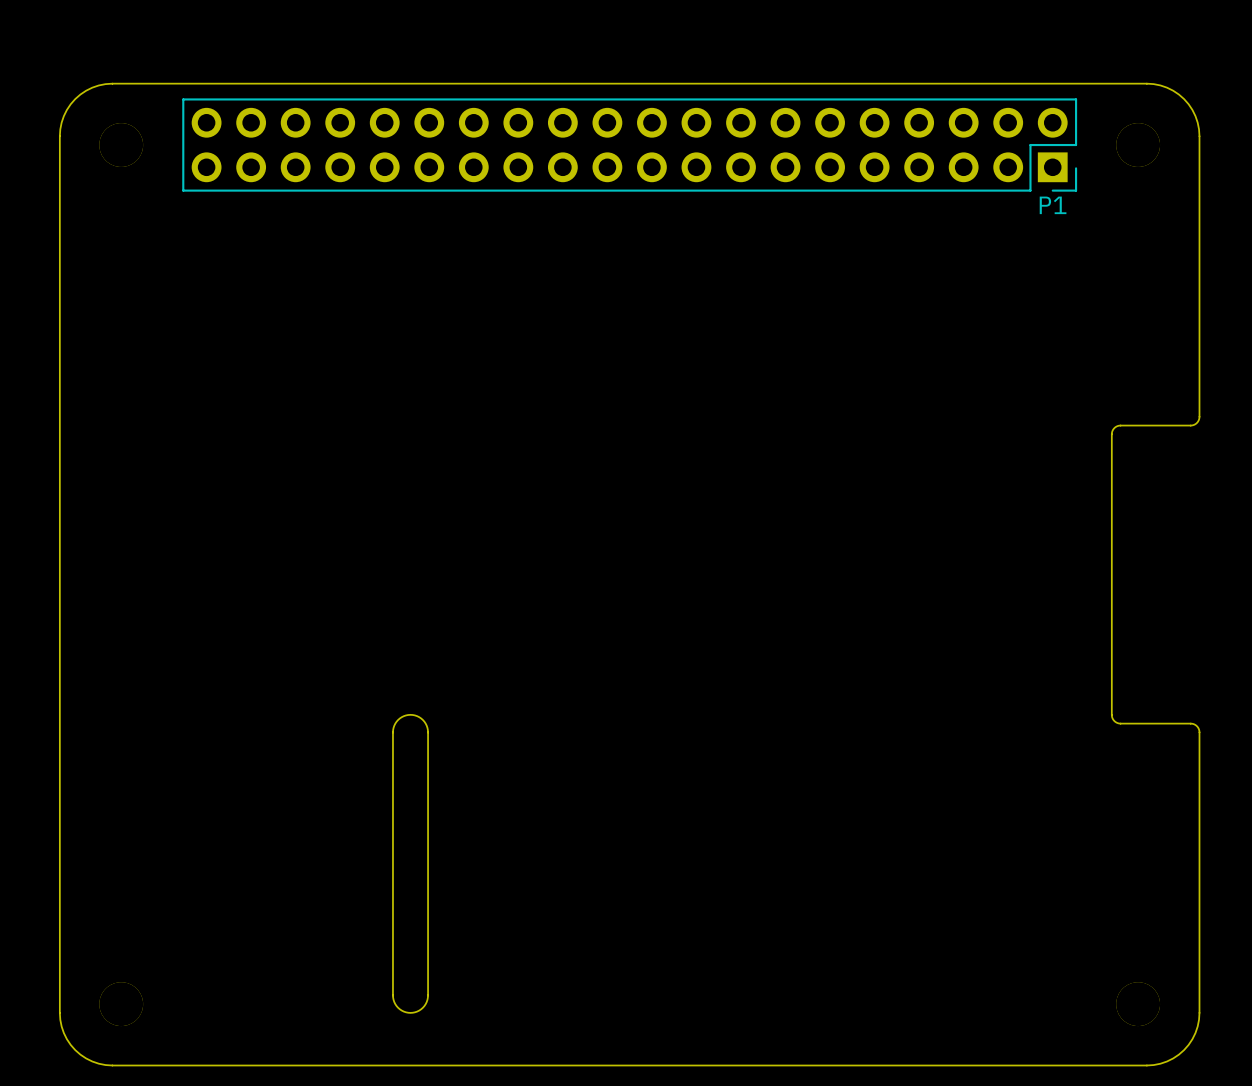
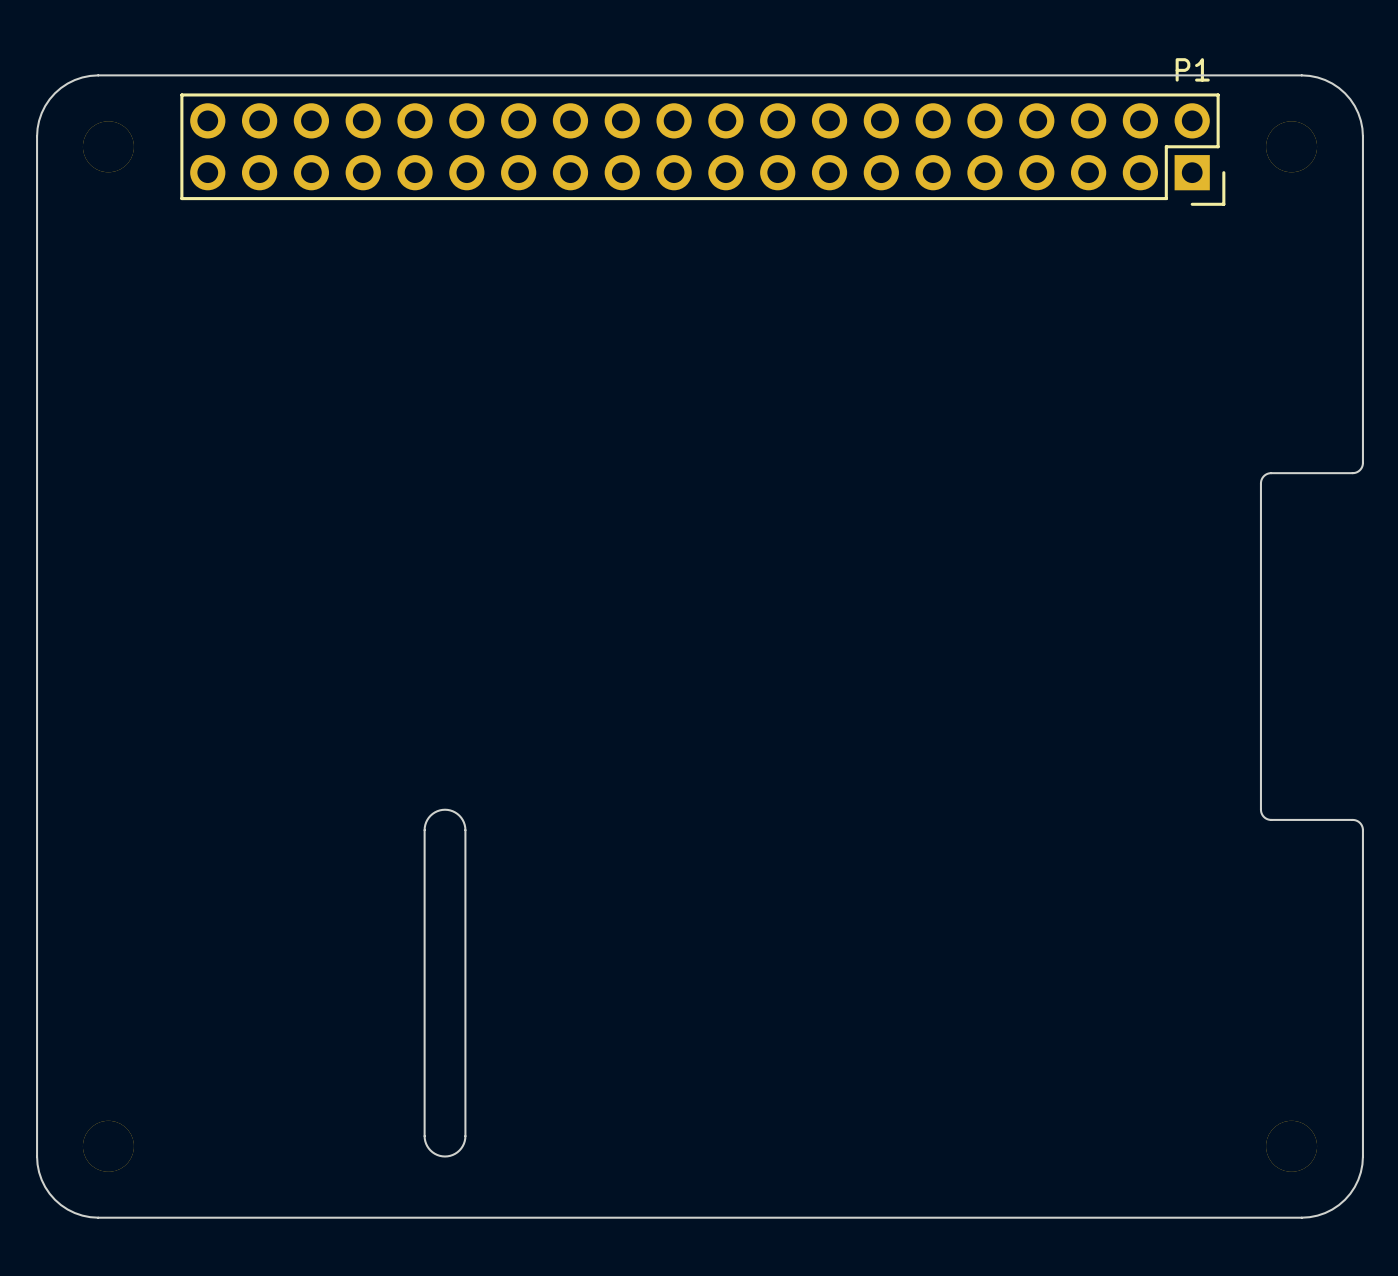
P1 footprint: [182, 98, 1078, 192] -> [180, 93, 1226, 206]
P1 name position: P1 (1053, 205) -> P1 (1192, 69)

